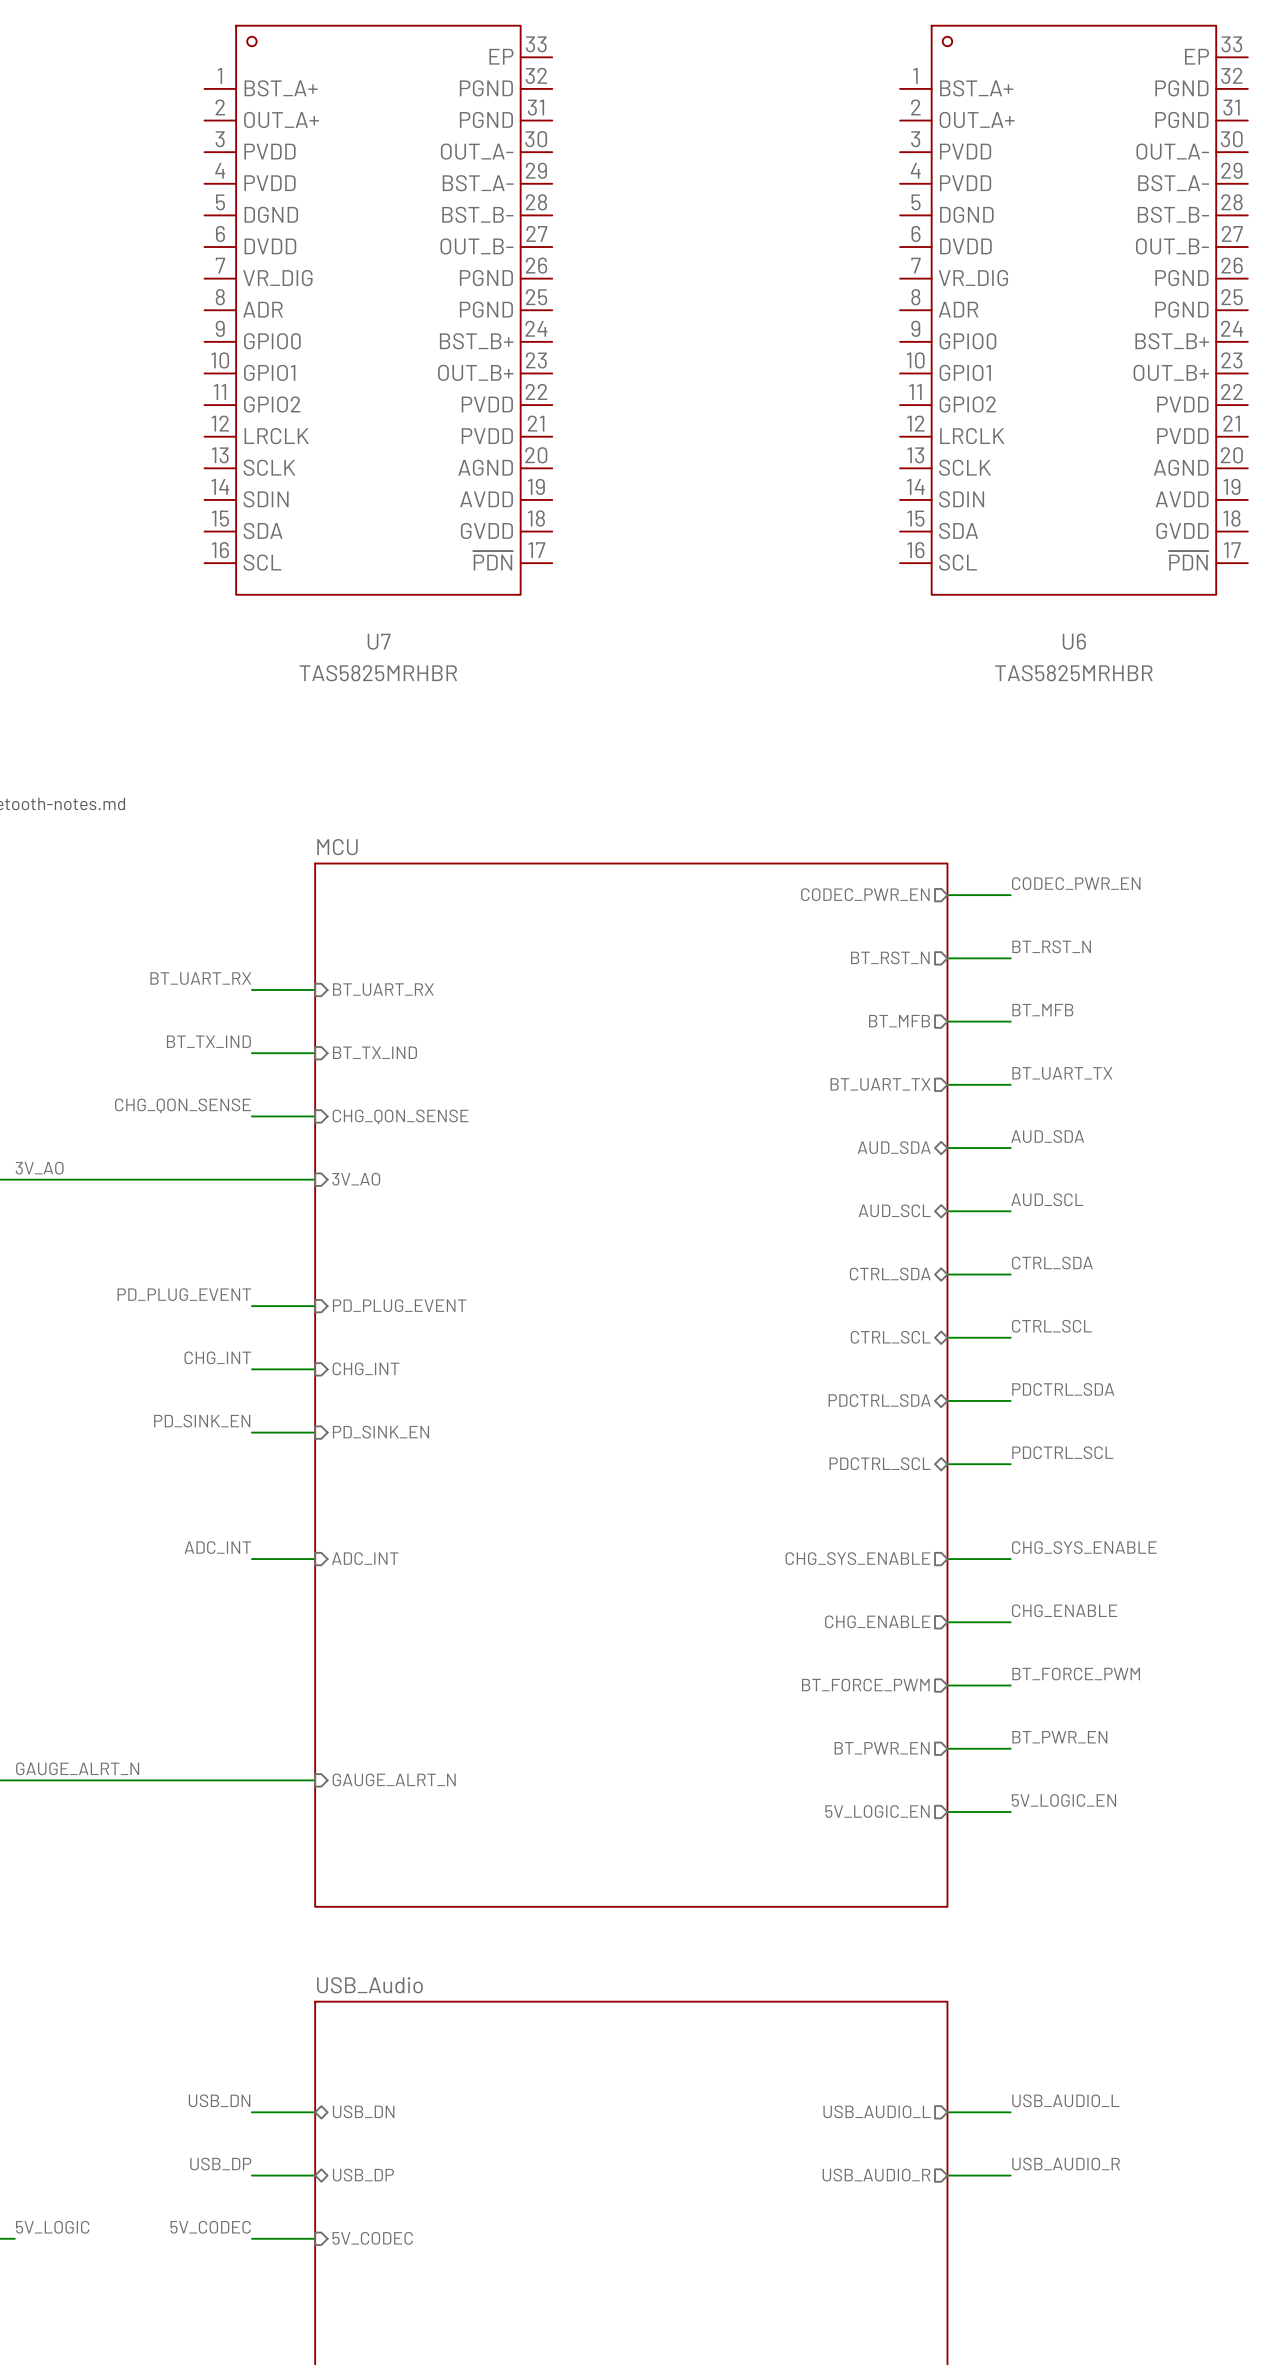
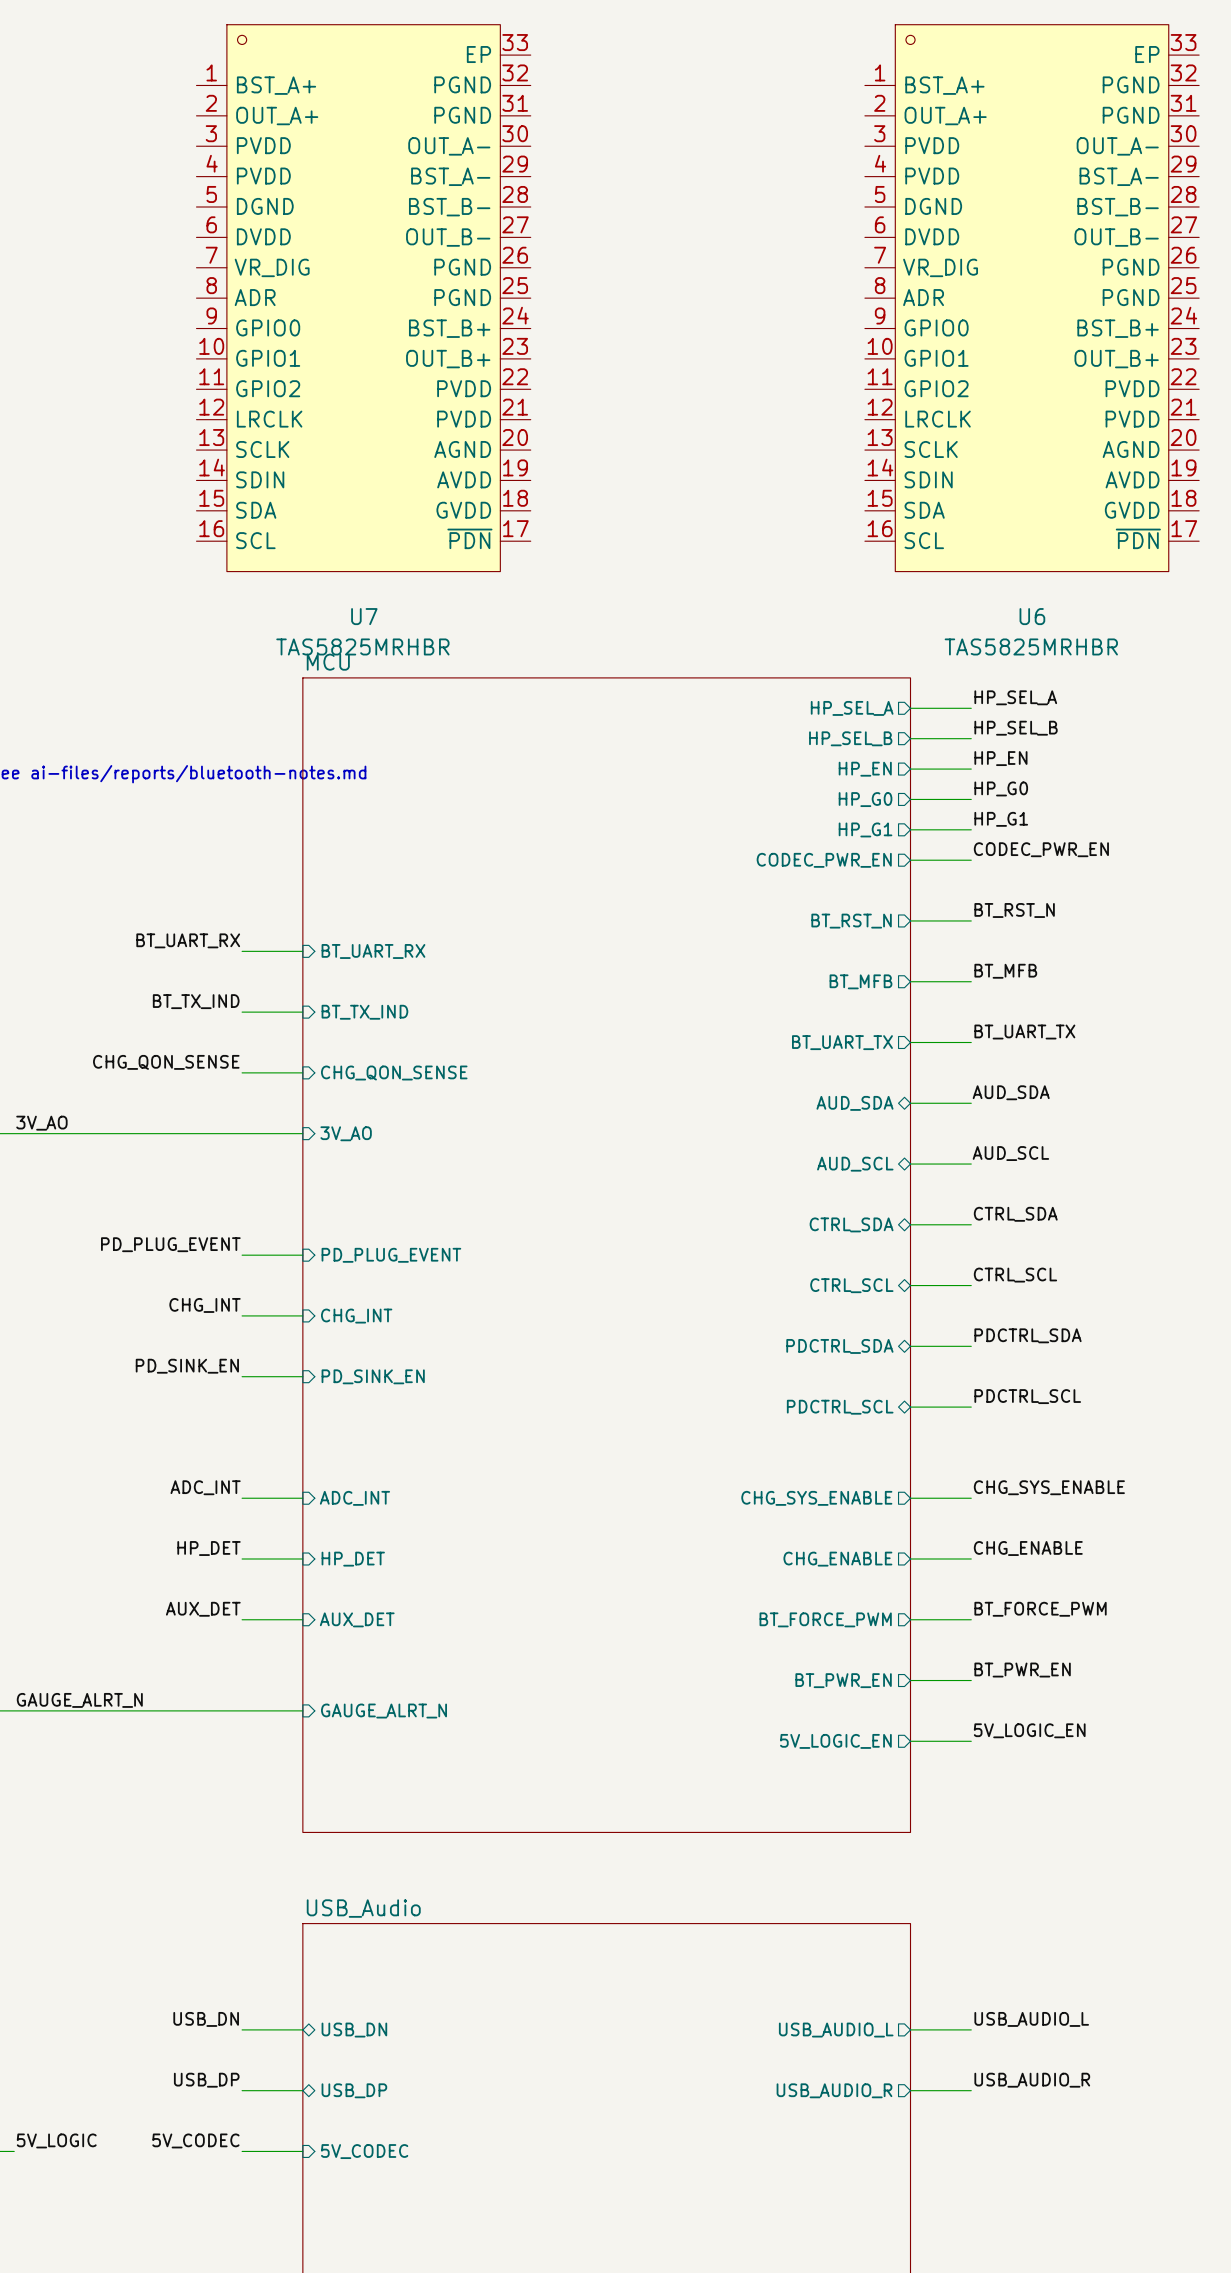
label: none -> HP_SEL_A (1015, 697)
sheet pin: none -> HP_SEL_A (852, 708)
wire: none -> (910, 708) (971, 708)
label: none -> HP_SEL_B (1016, 728)
sheet pin: none -> HP_SEL_B (850, 738)
wire: none -> (910, 738) (971, 738)
label: none -> HP_EN (1000, 758)
sheet pin: none -> HP_EN (865, 769)
wire: none -> (910, 769) (971, 769)
label: none -> HP_G0 (1001, 788)
sheet pin: none -> HP_G0 (865, 799)
wire: none -> (910, 799) (971, 799)
label: none -> HP_G1 (1001, 819)
sheet pin: none -> HP_G1 (865, 829)
wire: none -> (910, 829) (971, 829)
sheet MCU: none -> (606, 1255)
sheet MCU: (631, 1385) -> none
label: none -> HP_DET (209, 1548)
sheet pin: none -> HP_DET (353, 1559)
wire: none -> (242, 1558) (302, 1558)
label: none -> AUX_DET (203, 1609)
wire: none -> (242, 1619) (302, 1619)
sheet pin: none -> AUX_DET (357, 1619)

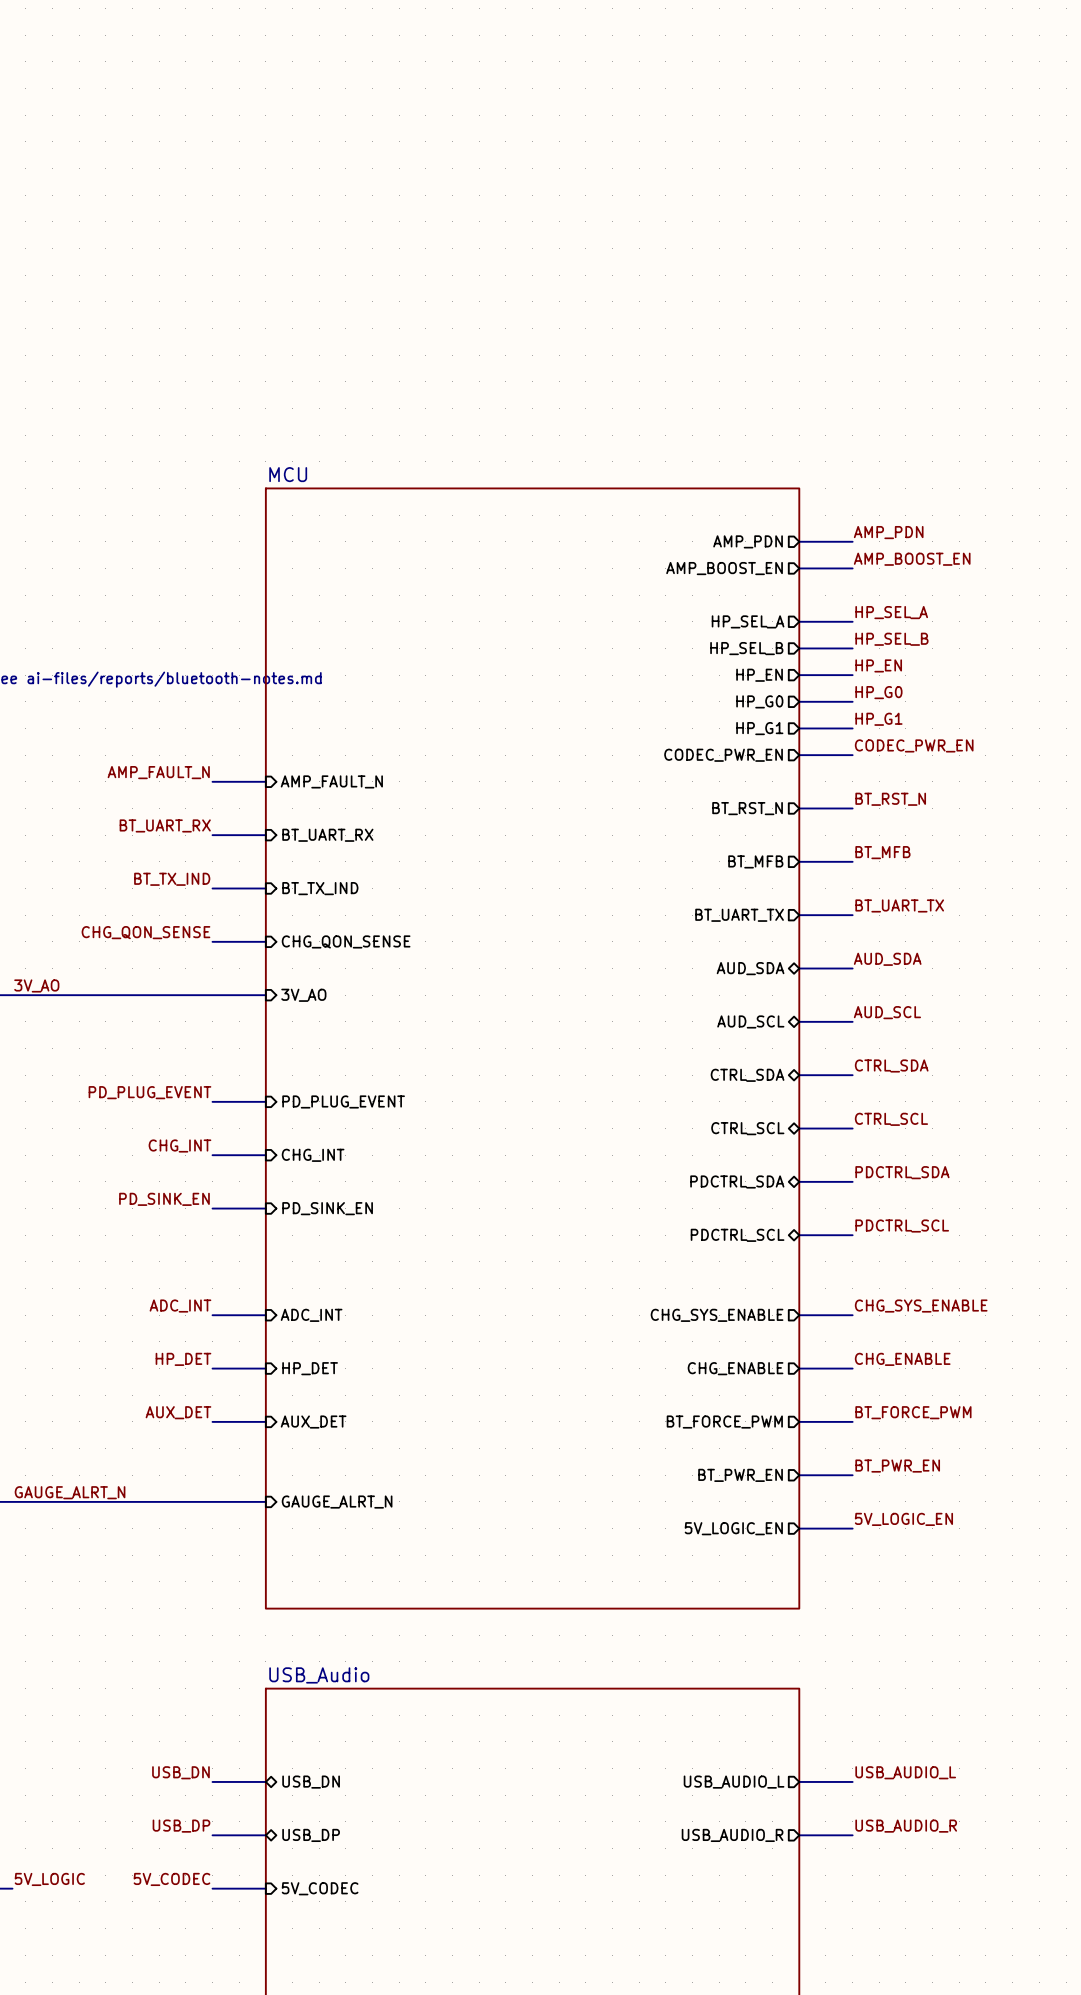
U7: TAS5825MRHBR (363, 298) -> none
U6: TAS5825MRHBR (1032, 298) -> none
label: none -> AMP_PDN (888, 532)
sheet pin: none -> AMP_PDN (748, 541)
wire: none -> (799, 541) (852, 541)
label: none -> AMP_BOOST_EN (912, 559)
sheet pin: none -> AMP_BOOST_EN (724, 568)
wire: none -> (799, 568) (852, 568)
label: none -> AMP_FAULT_N (158, 772)
wire: none -> (212, 781) (265, 781)
sheet pin: none -> AMP_FAULT_N (331, 781)
sheet MCU: none -> (532, 1048)
sheet MCU: (606, 1255) -> none

